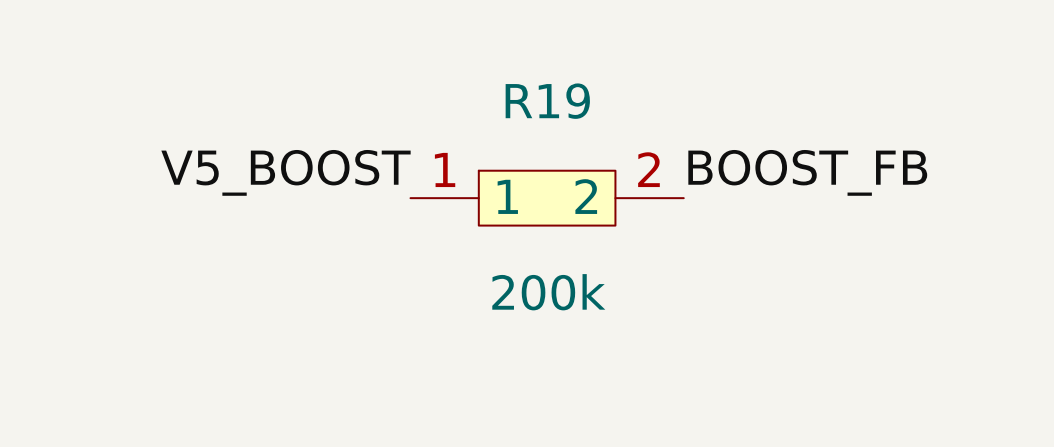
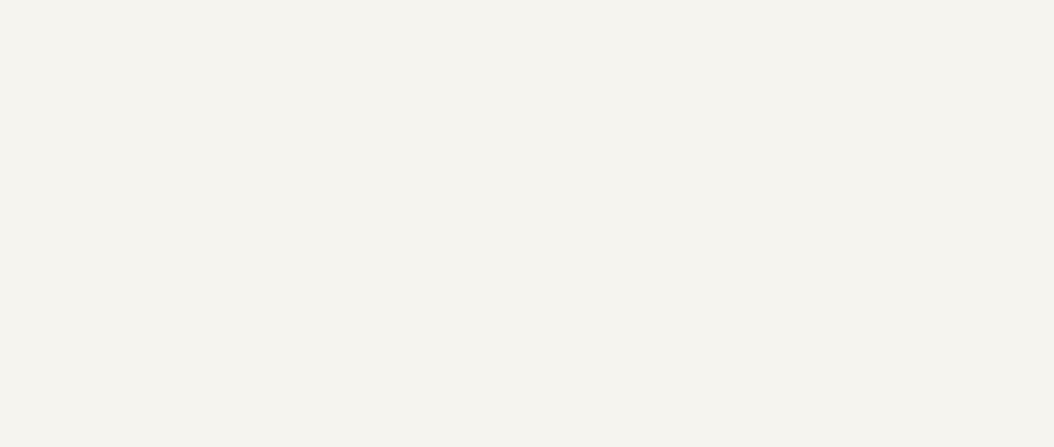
label: V5_BOOST (285, 172) -> none
label: BOOST_FB (807, 172) -> none
R19: 200k (547, 198) -> none

